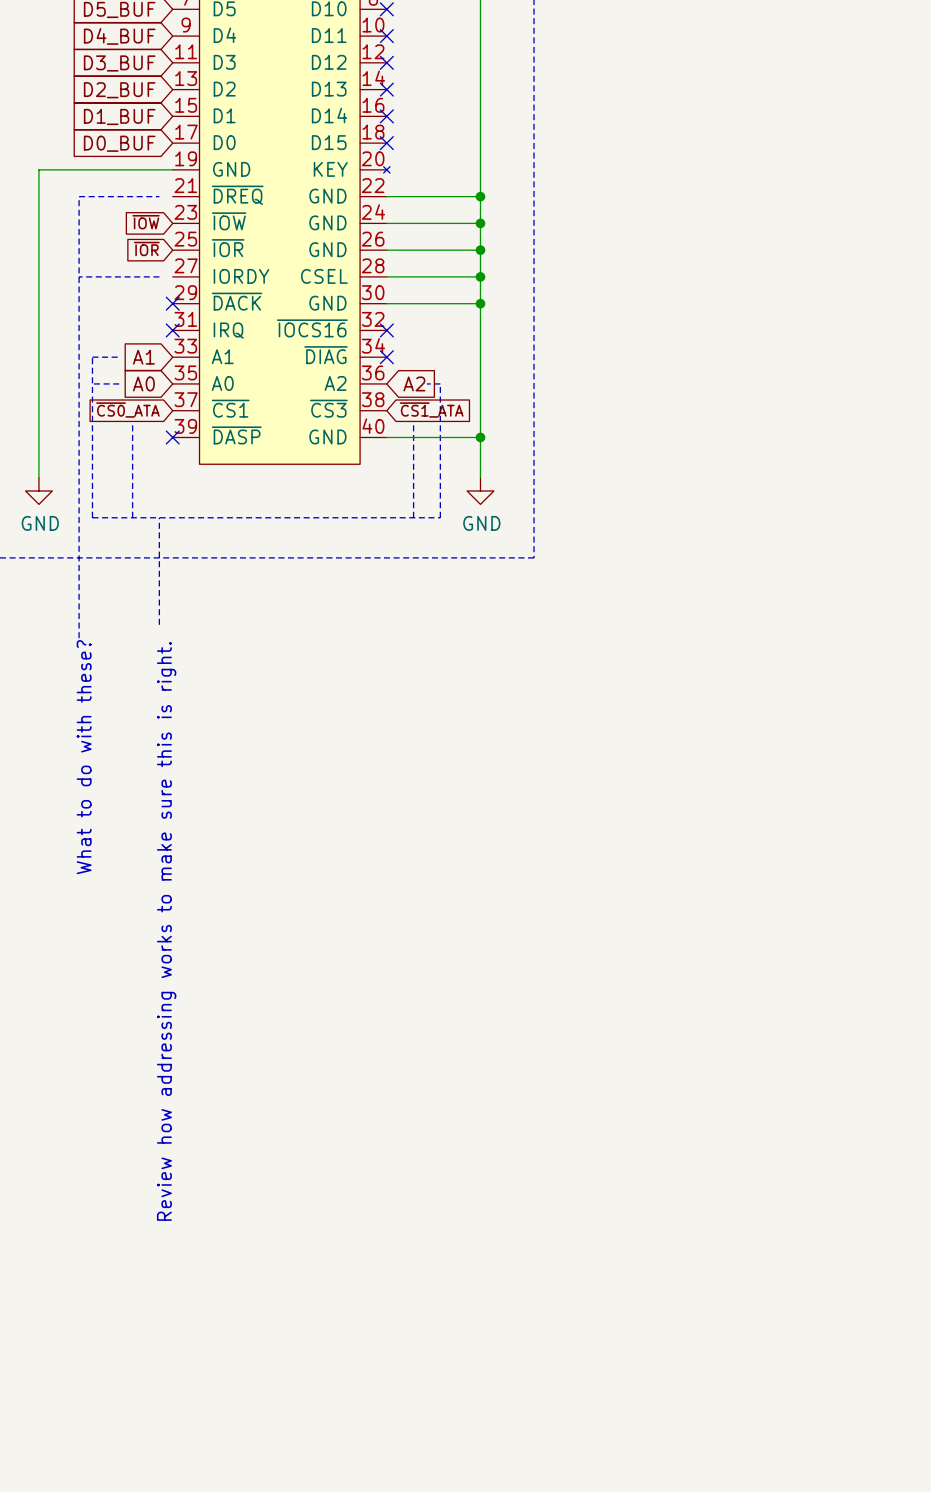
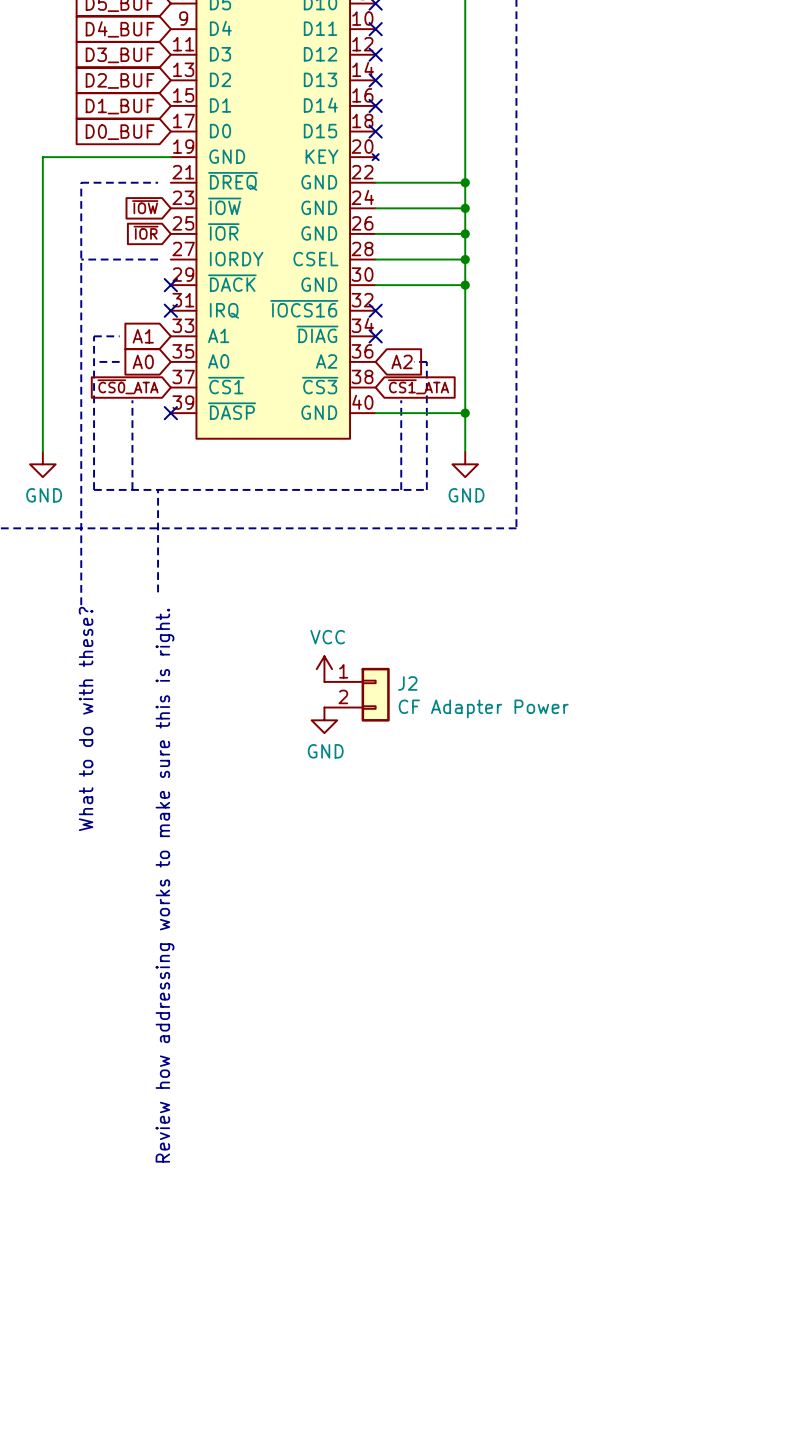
power symbol: none -> VCC (324, 669)
J2: none -> CF Adapter Power (357, 694)
power symbol: none -> GND (324, 720)

